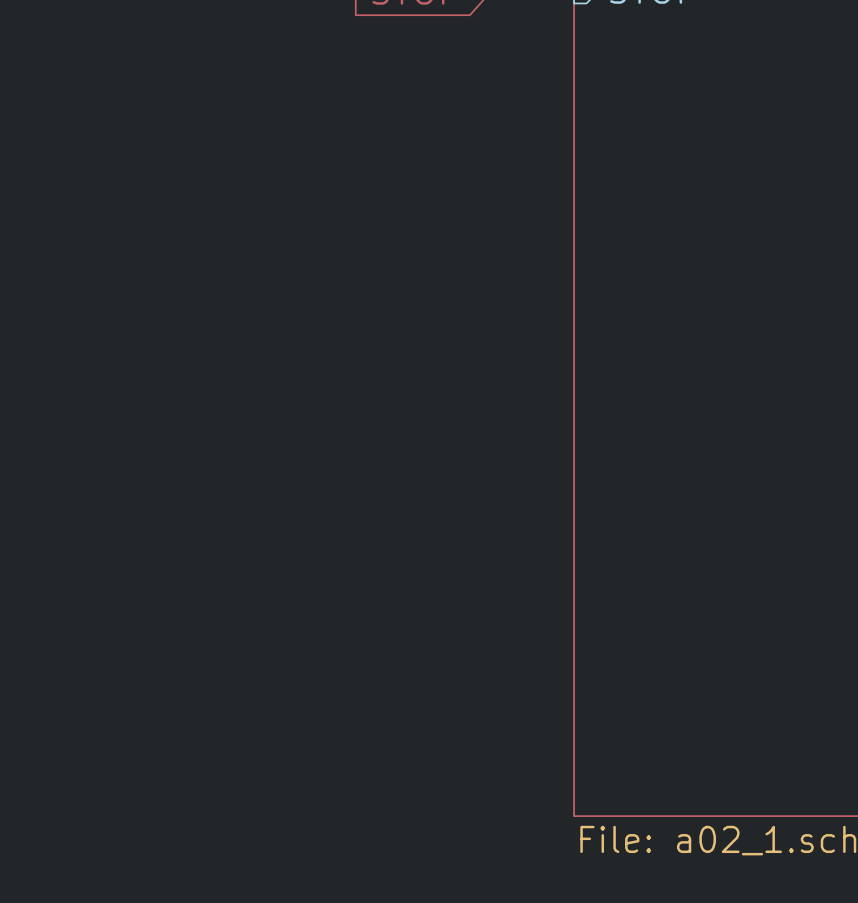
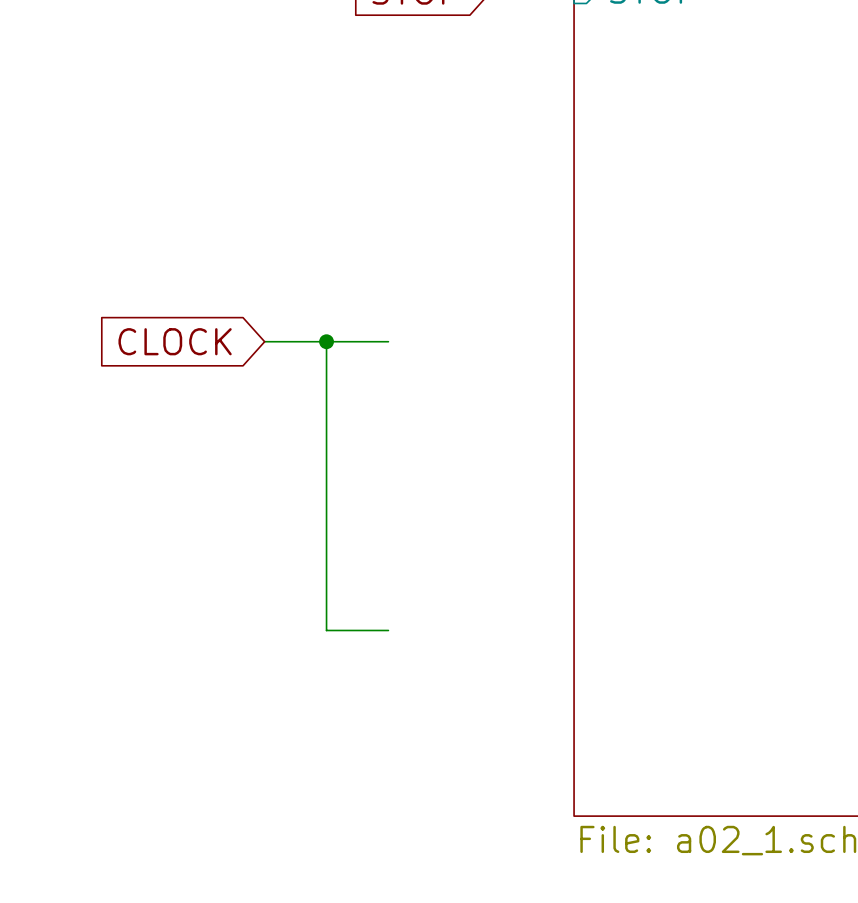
global label: none -> CLOCK (175, 341)
wire: none -> (264, 341) (388, 341)
wire: none -> (326, 341) (326, 630) (388, 630)
junction: none -> (326, 341)

